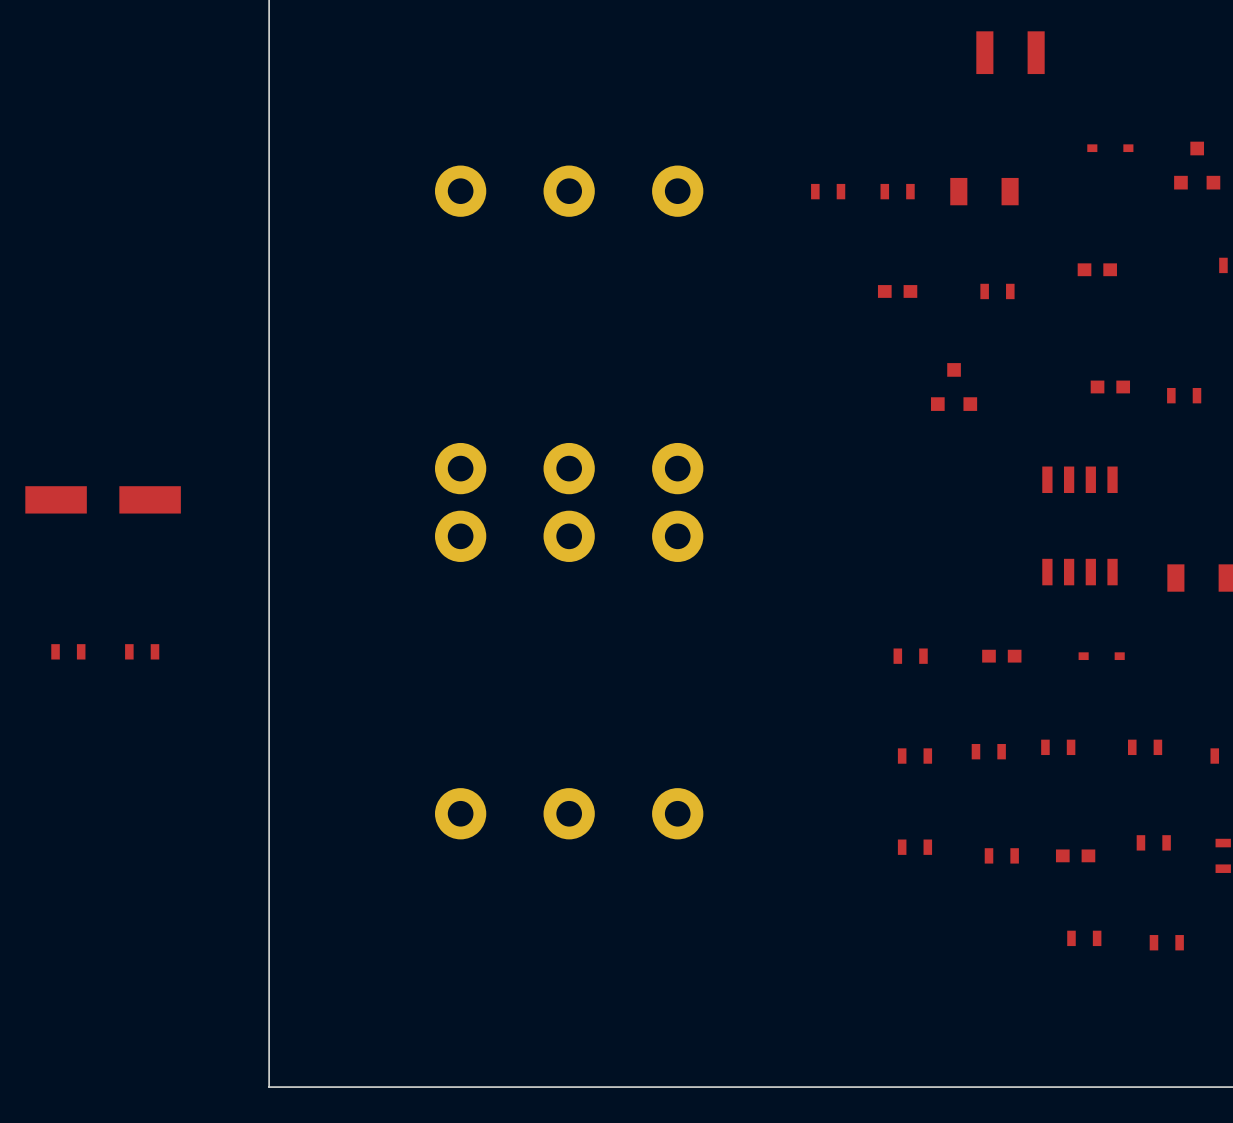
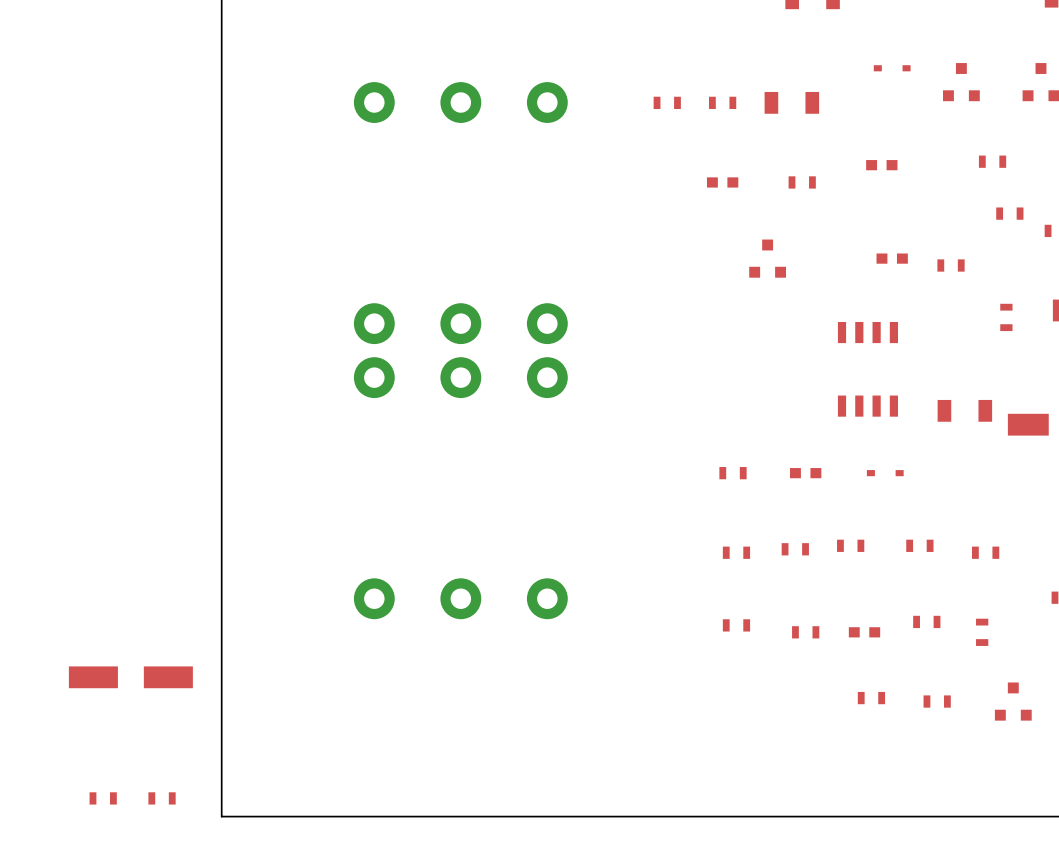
part position: (103, 499) -> (130, 677)
part: (68, 651) -> none
part: (142, 651) -> none
part: none -> (103, 798)
part: none -> (162, 798)

